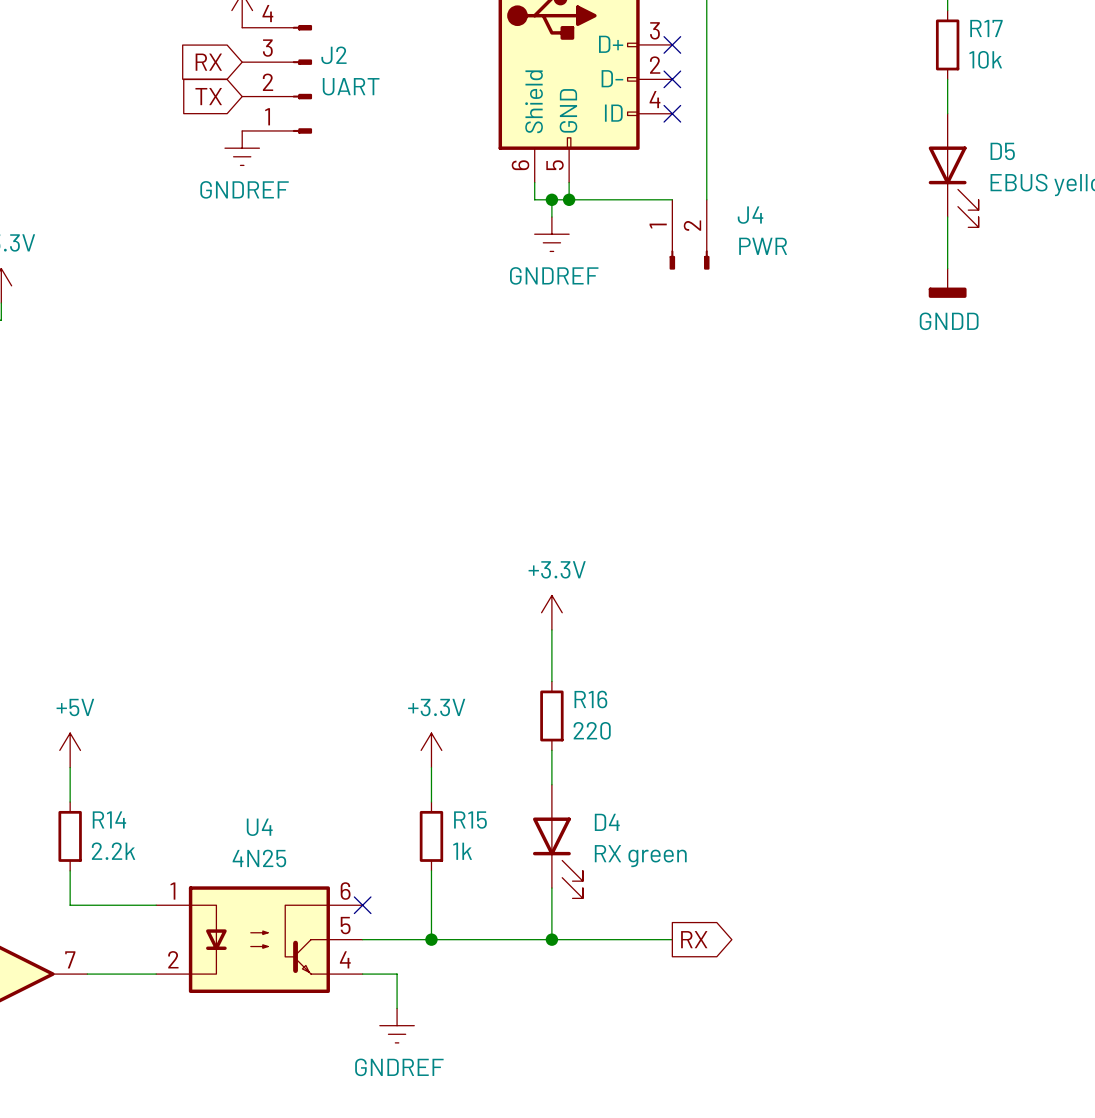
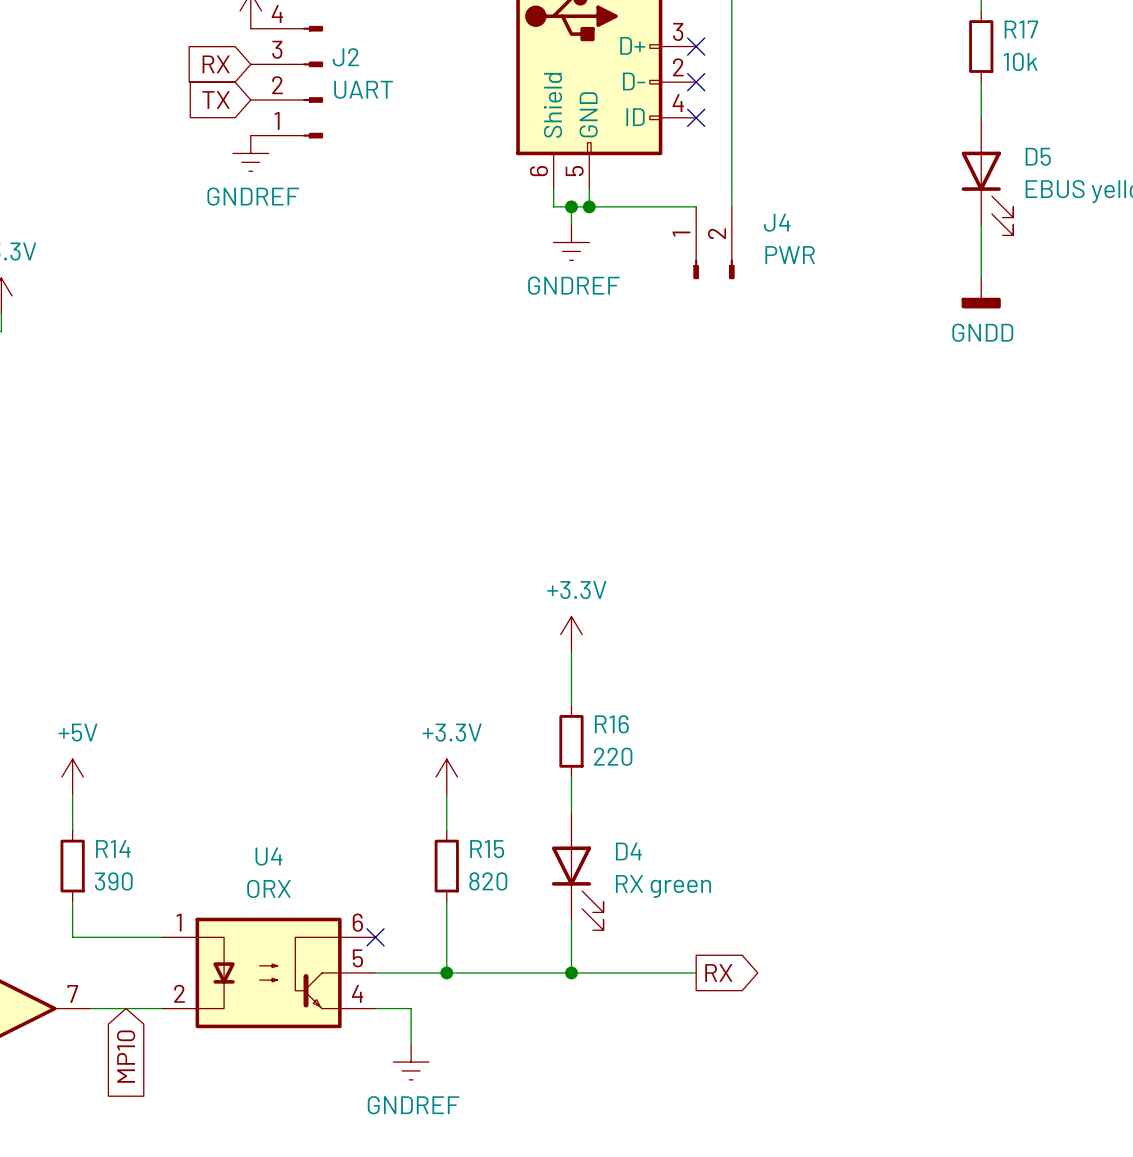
R14 value: 2.2k (113, 851) -> 390 (113, 881)
R15 value: 1k (462, 851) -> 820 (488, 881)
U4 value: 4N25 (259, 858) -> ORX (269, 888)
global label: none -> MP10 (126, 1056)

